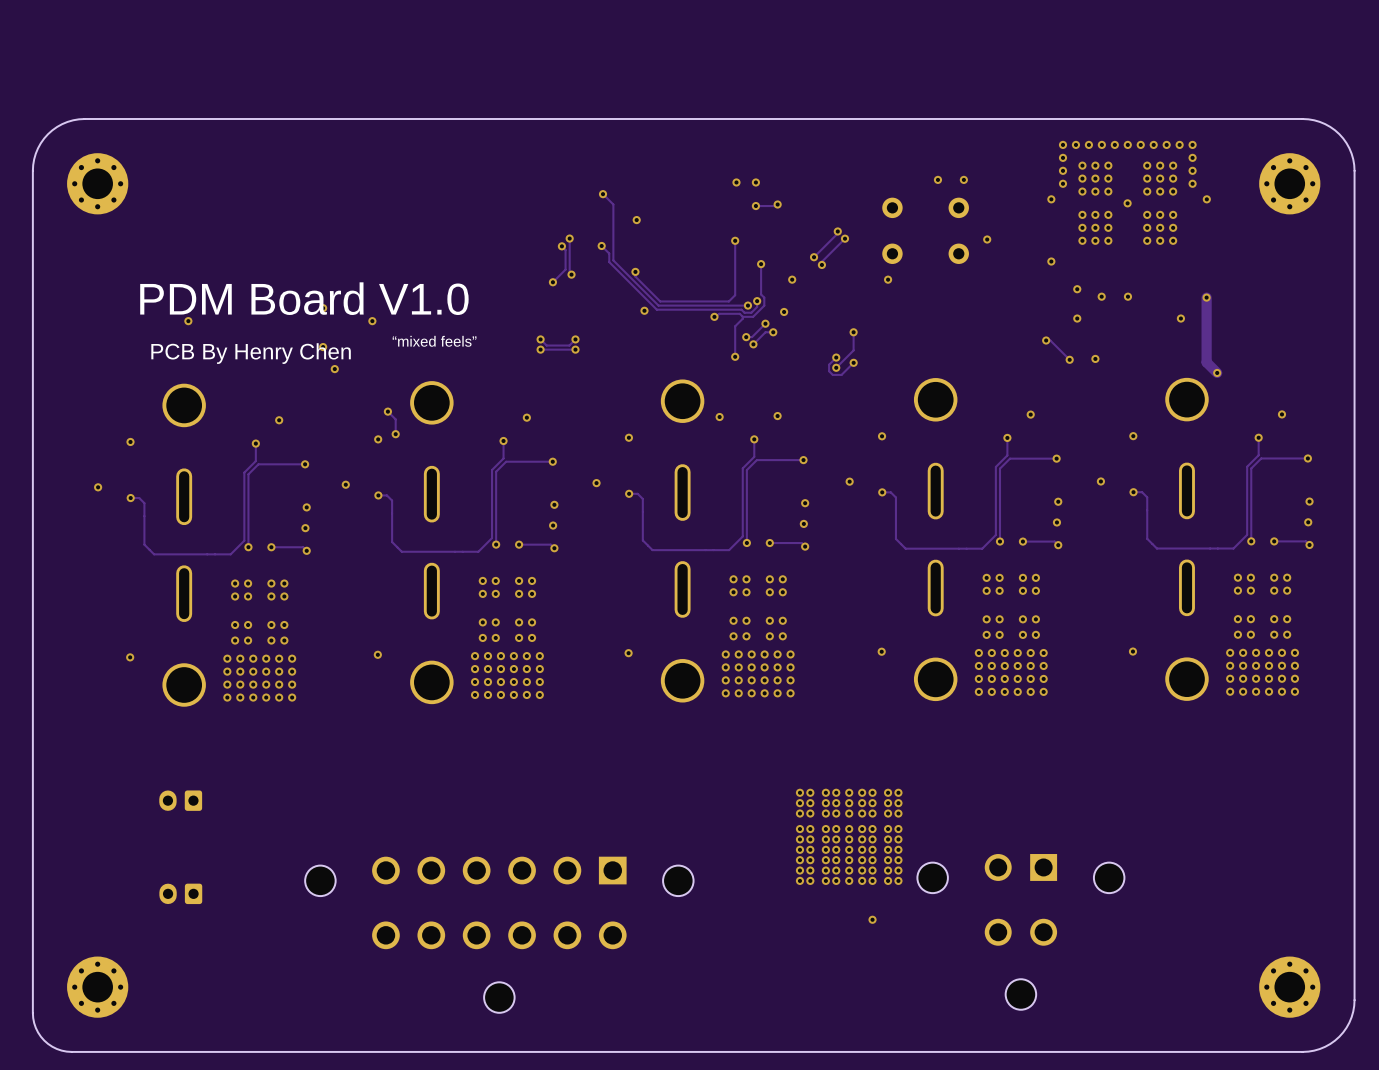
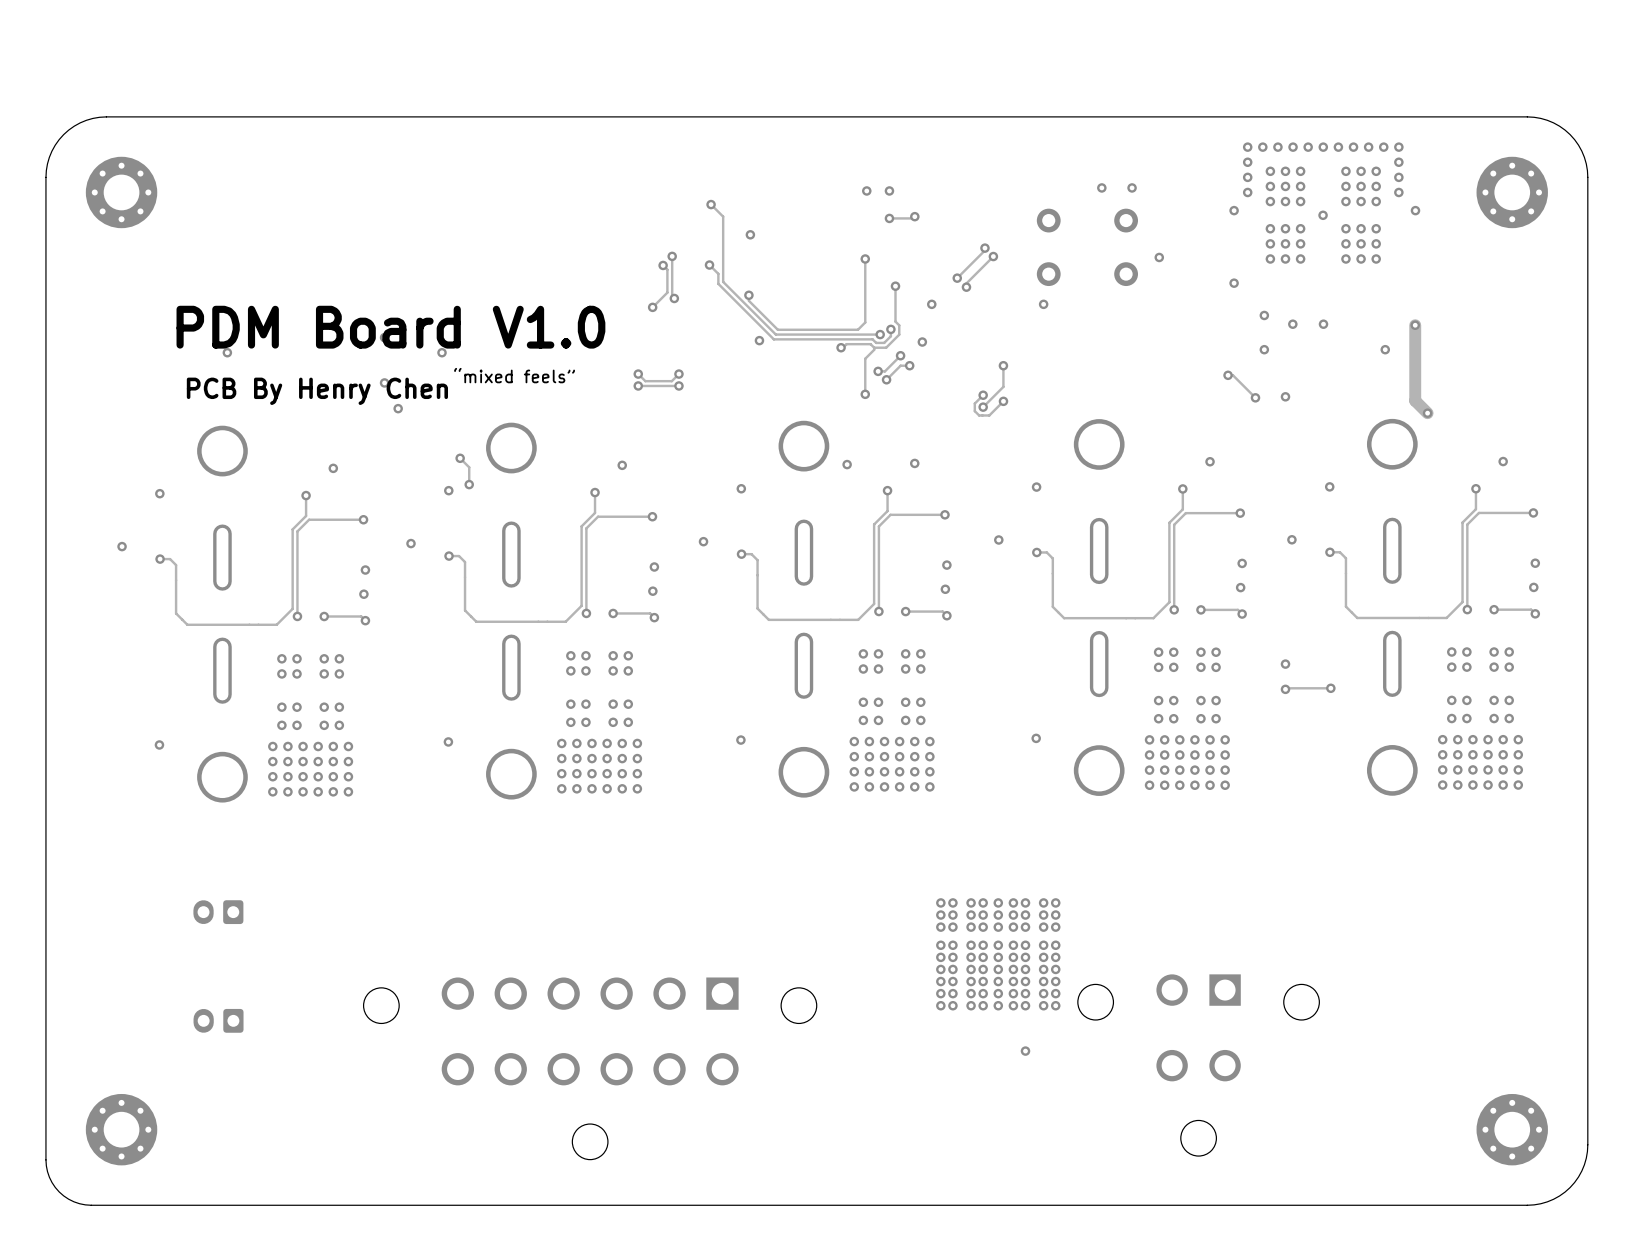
via: none -> (1285, 664)
track: none -> (1330, 688) (1285, 689)
via: none -> (1330, 688)
via: none -> (1285, 689)
via: (1132, 651) -> none

